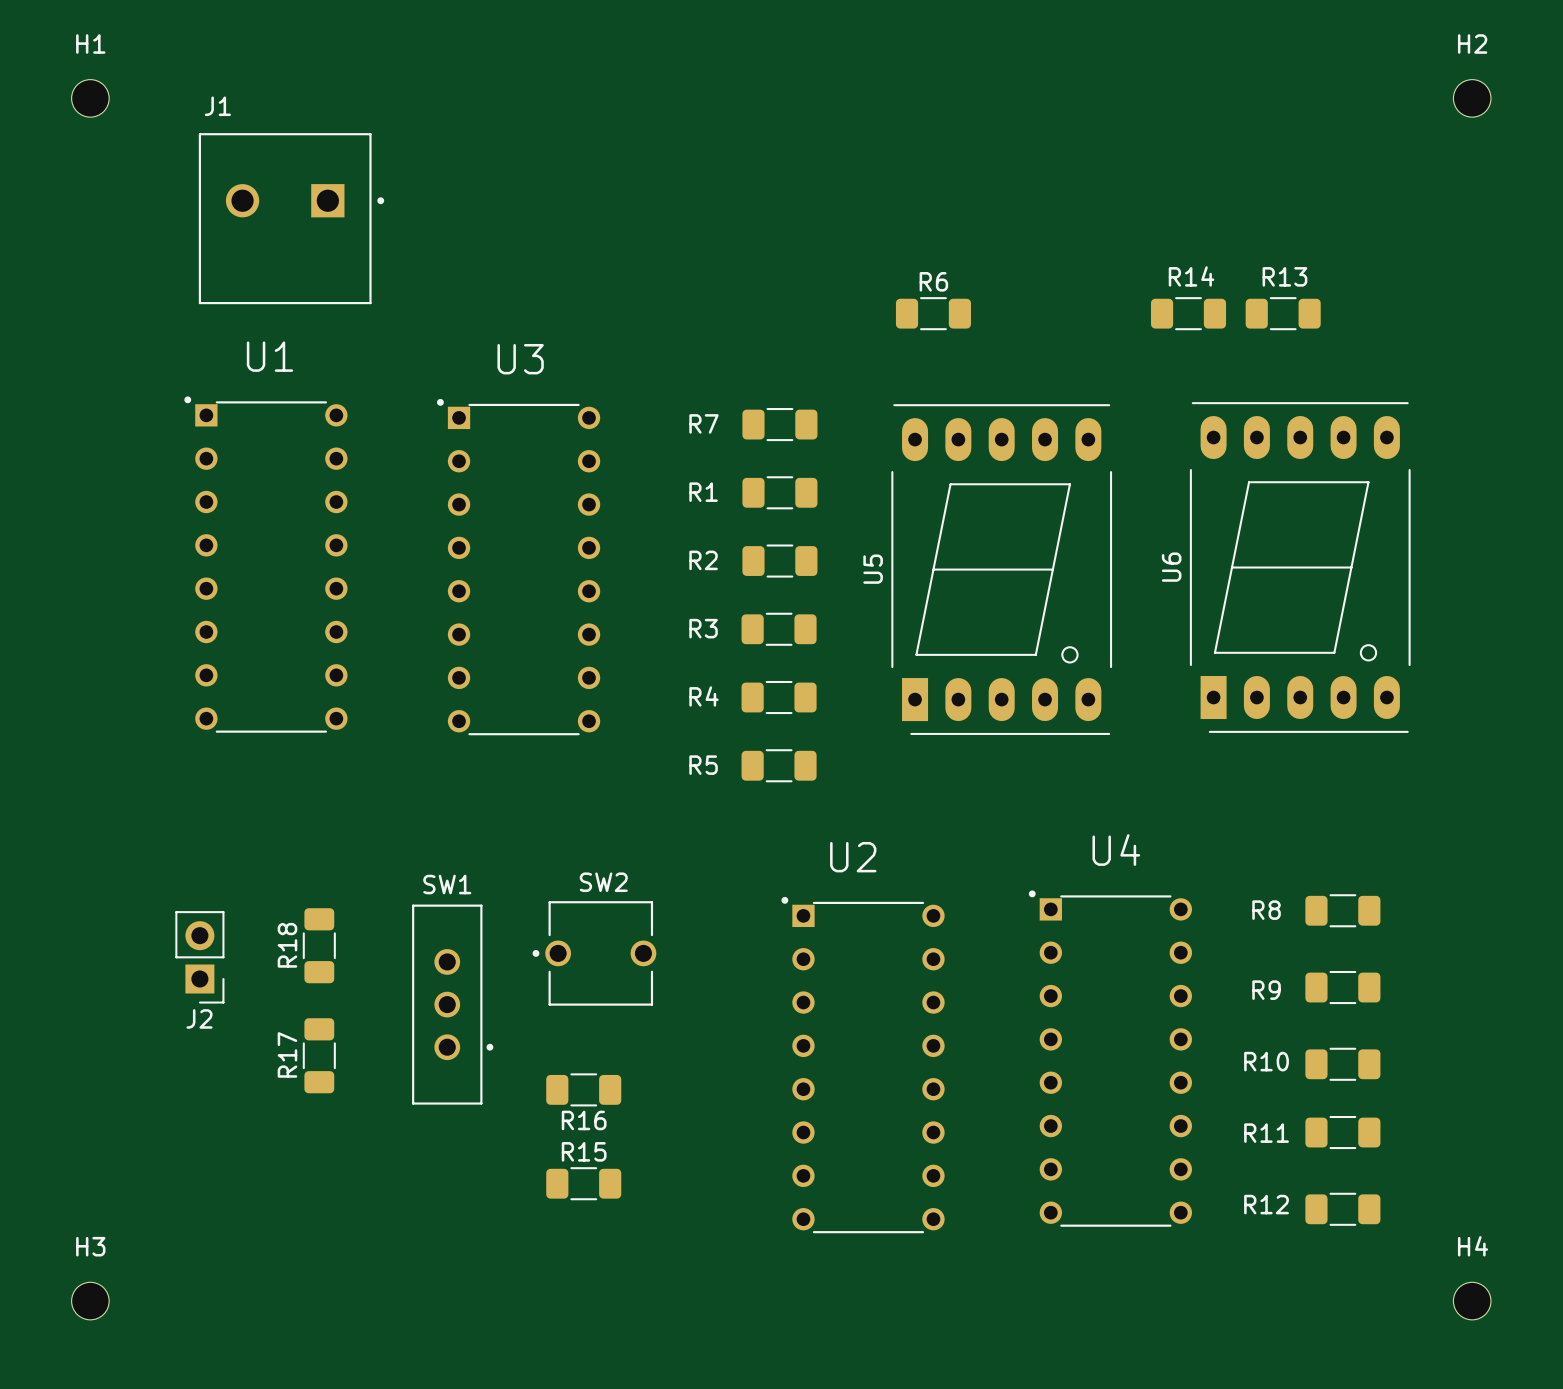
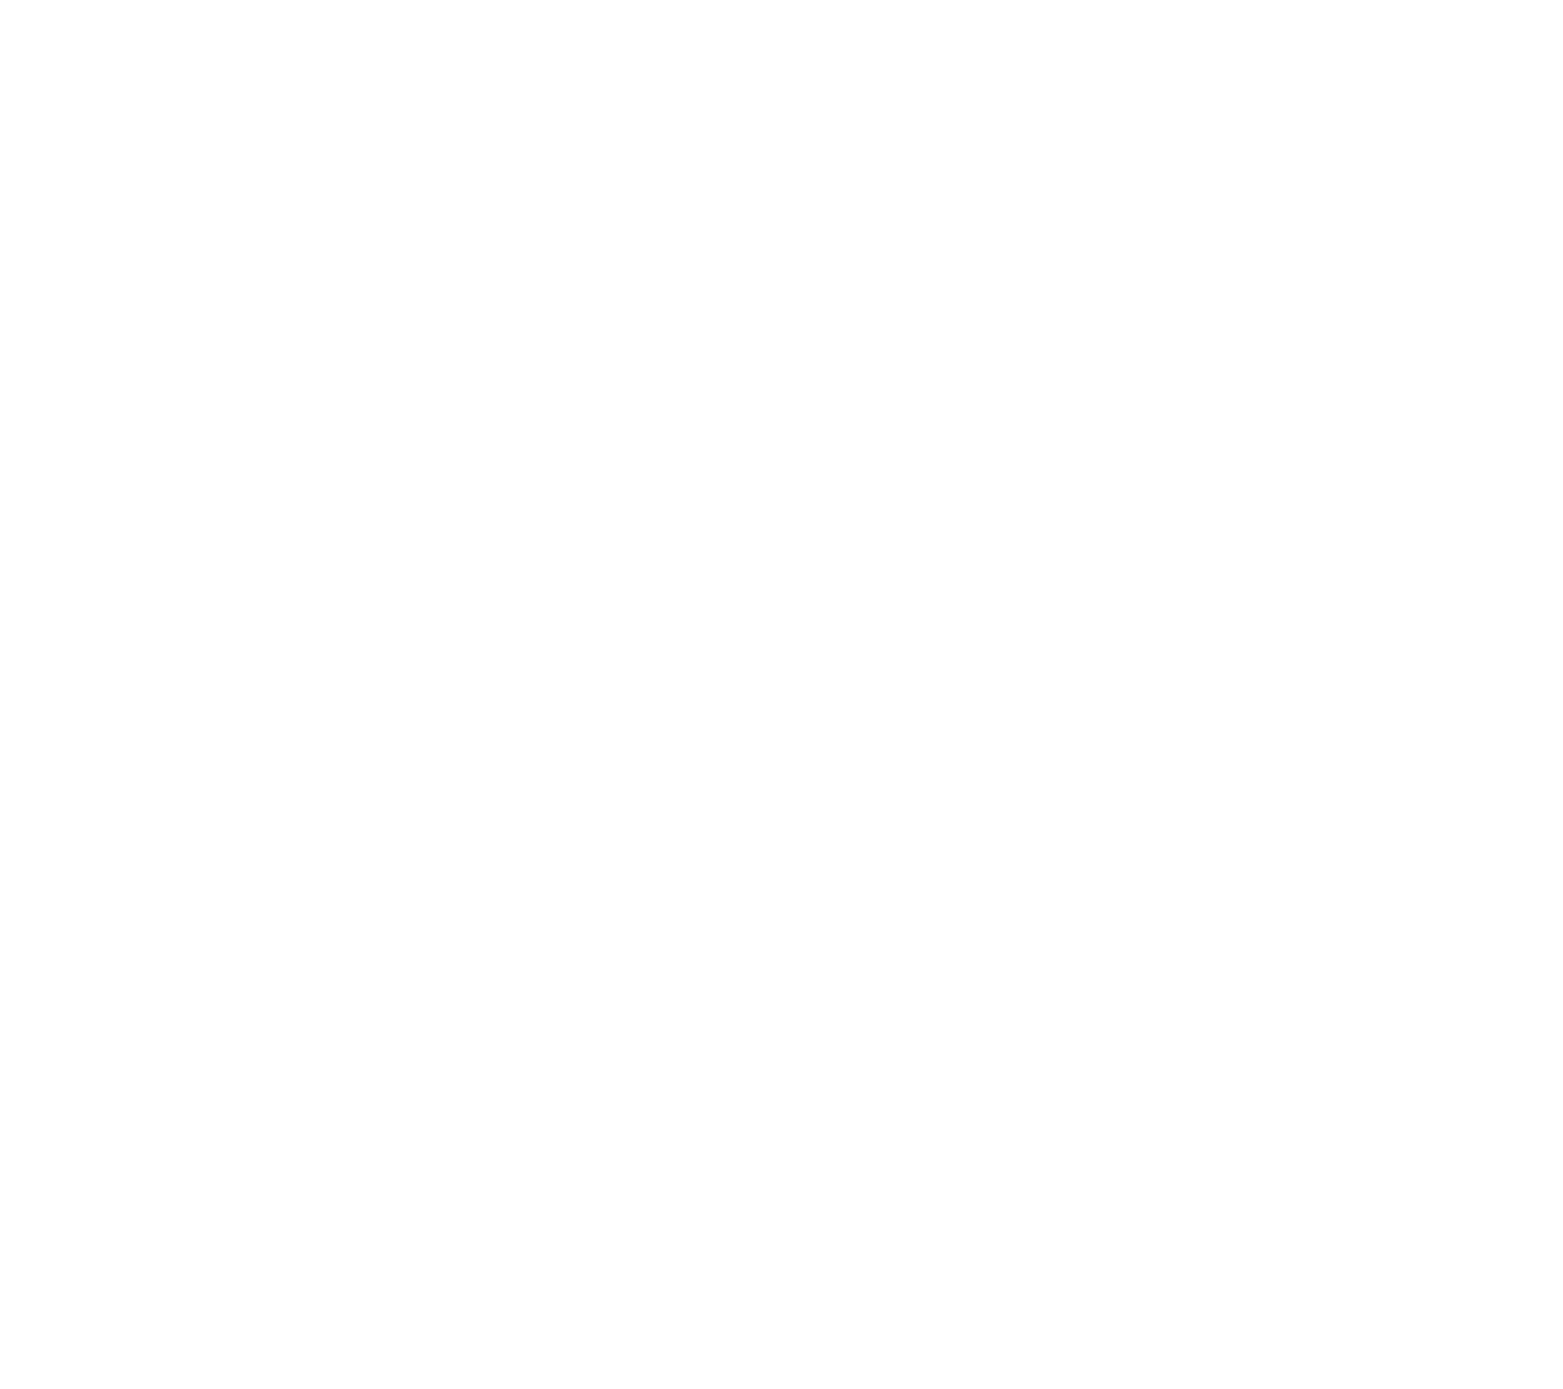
H1: (90, 98) -> none
H2: (1472, 98) -> none
J1: (291, 218) -> none
R6: (933, 313) -> none
R14: (1188, 313) -> none
R13: (1283, 313) -> none
R7: (779, 424) -> none
R1: (779, 492) -> none
R2: (779, 561) -> none
U1: (265, 564) -> none
U3: (518, 567) -> none
U6: (1300, 567) -> none
U5: (1001, 569) -> none
R3: (779, 629) -> none
R4: (779, 697) -> none
R5: (779, 765) -> none
R8: (1342, 910) -> none
R18: (319, 945) -> none
SW2: (594, 953) -> none
J2: (199, 957) -> none
R9: (1342, 987) -> none
SW1: (452, 1004) -> none
R17: (319, 1055) -> none
U4: (1110, 1058) -> none
R10: (1342, 1064) -> none
U2: (863, 1065) -> none
R16: (583, 1089) -> none
R11: (1342, 1132) -> none
R15: (583, 1183) -> none
R12: (1342, 1209) -> none
H3: (90, 1301) -> none
H4: (1472, 1301) -> none

